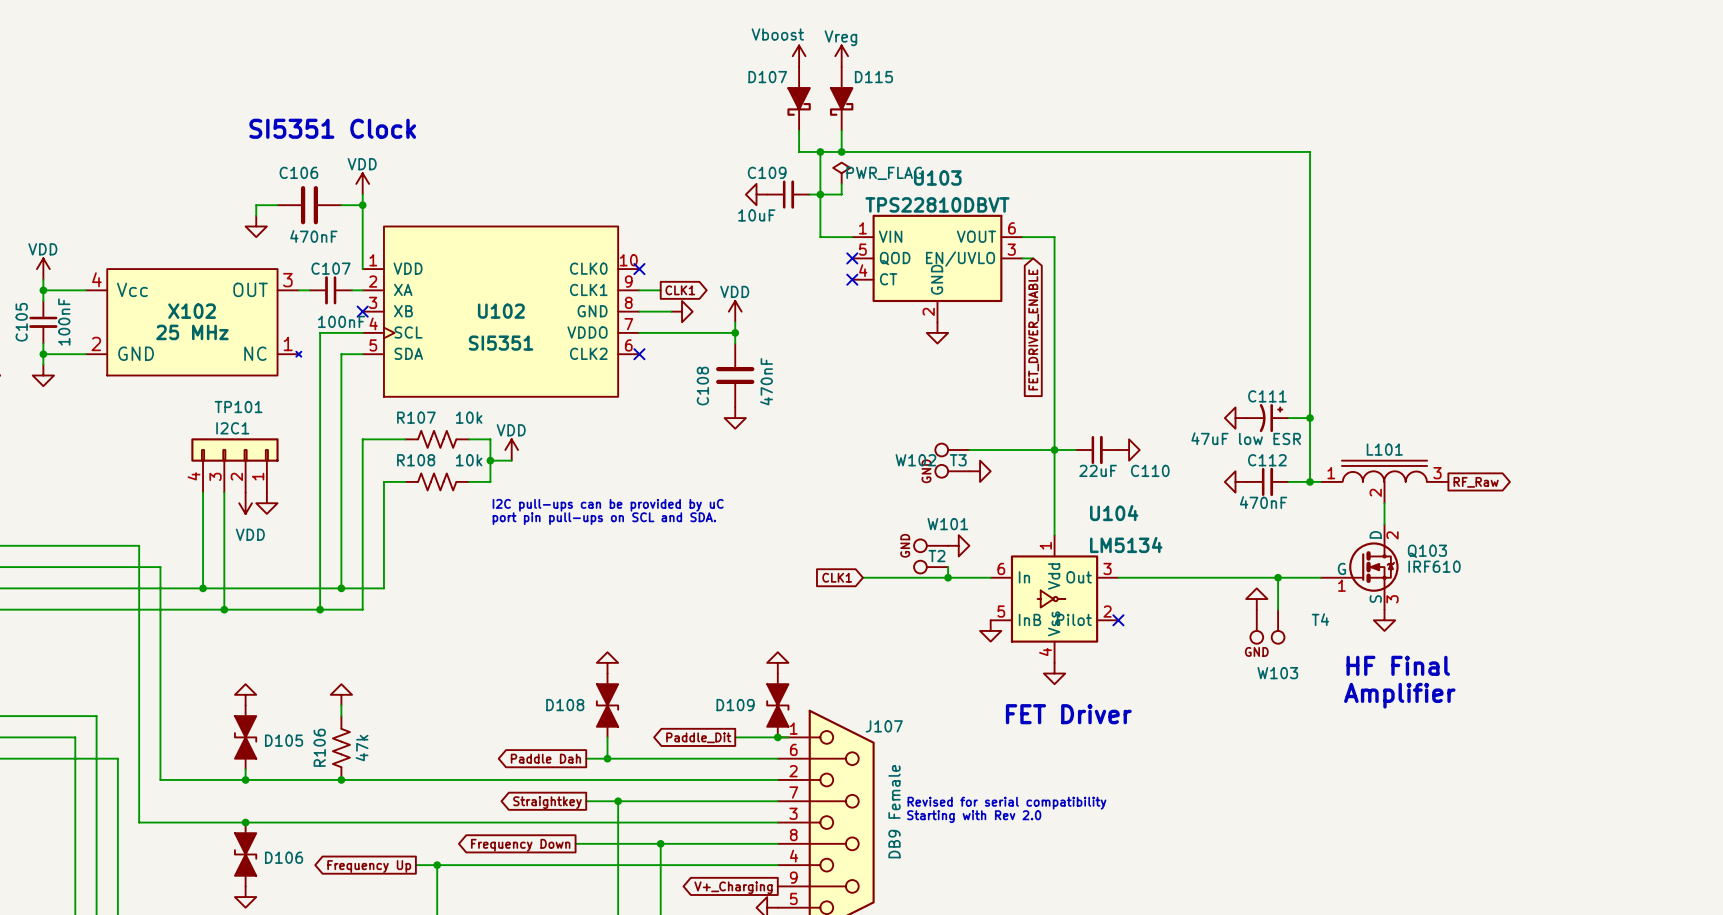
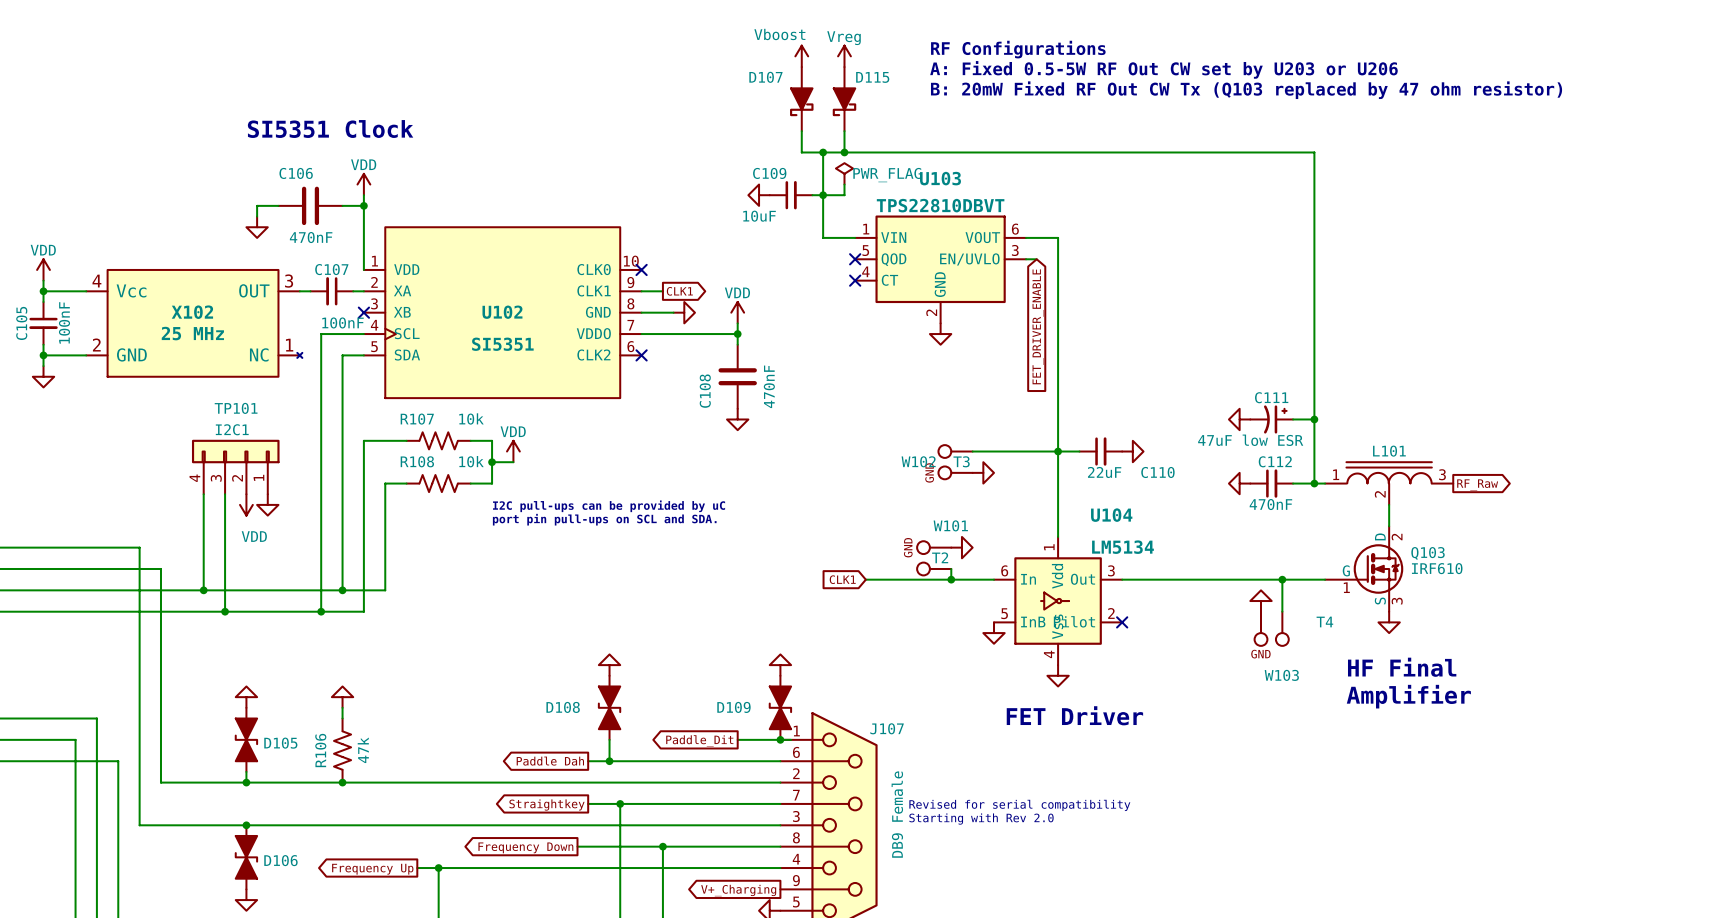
text: none -> RF Configurations (1018, 49)
text: none -> A: Fixed 0.5-5W RF Out CW set by U203 or U206 (1163, 69)
text: none -> B: 20mW Fixed RF Out CW Tx (Q103 replaced by 47 ohm resistor) (1246, 90)

